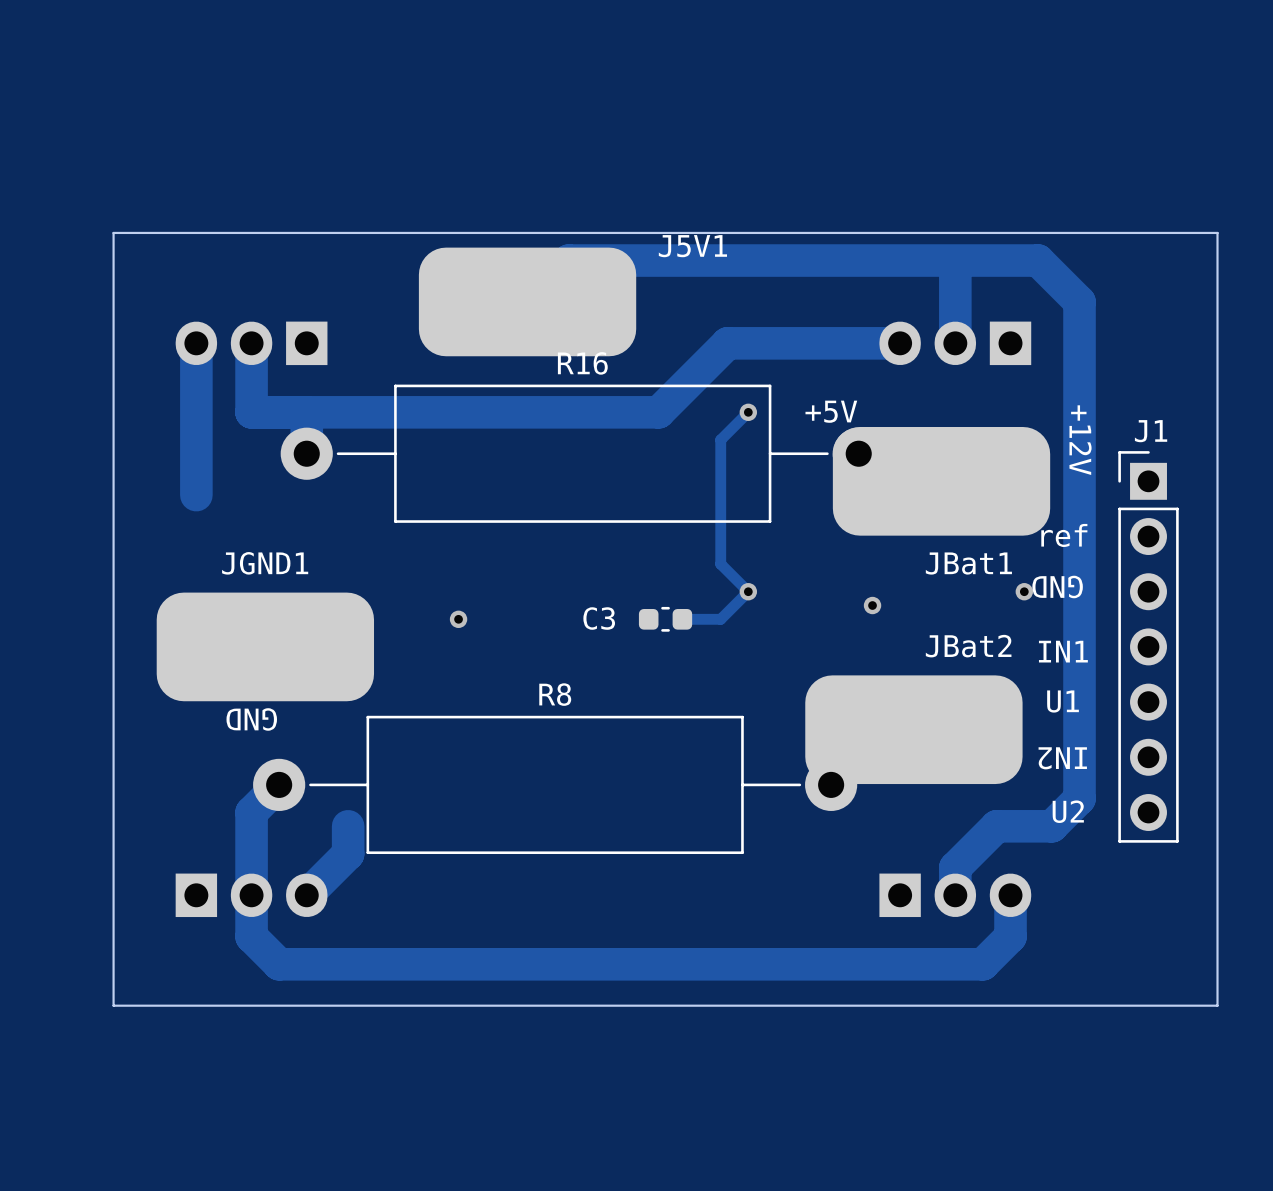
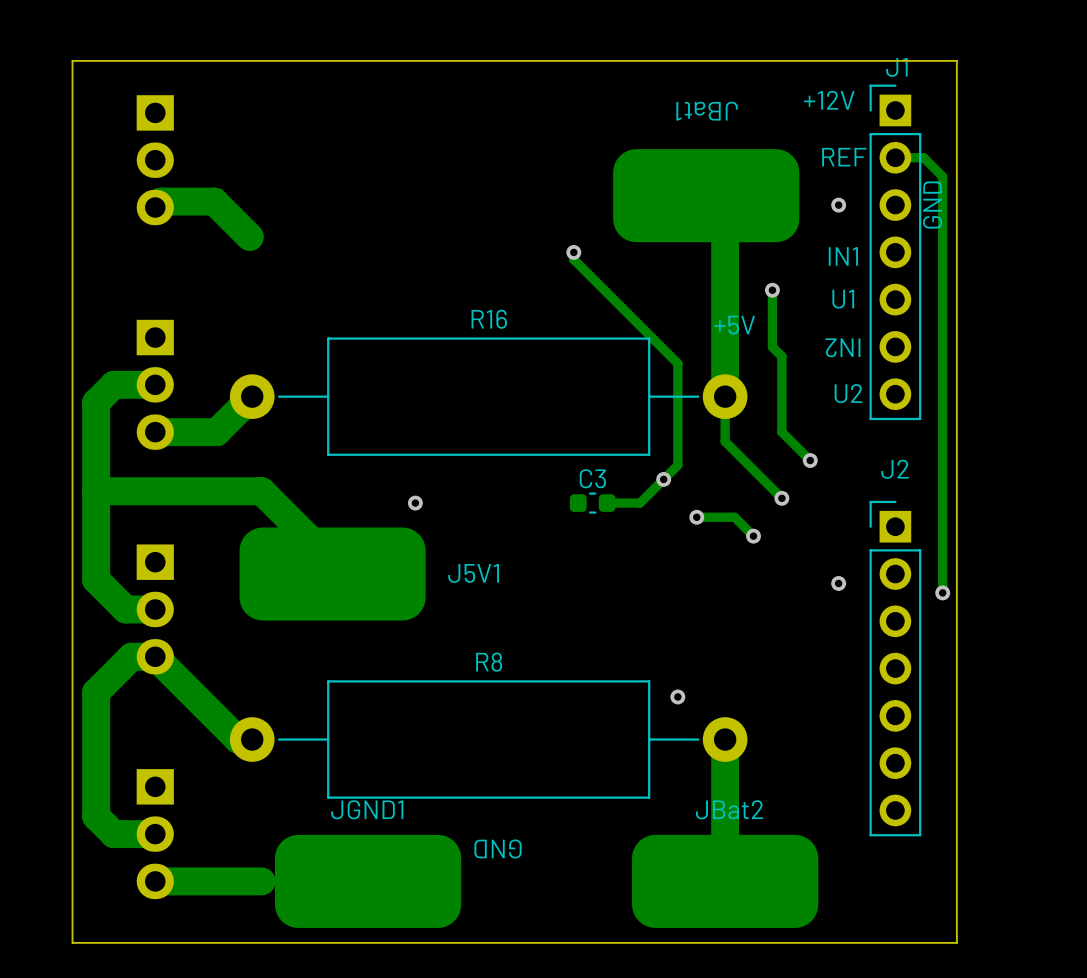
text: none -> REF (844, 157)
track: none -> (895, 157) (923, 157) (942, 176) (942, 592)
part: none -> (155, 160)
board edge: (1217, 232) (113, 232) (113, 1005) (1217, 1005) (1217, 232) -> (956, 60) (956, 942) (72, 942) (72, 60) (956, 60)
J5V1 name position: J5V1 (692, 246) -> J5V1 (473, 573)
track: none -> (706, 195) (725, 214) (725, 441) (781, 498)
via: none -> (838, 205)
track: none -> (155, 207) (161, 201) (214, 201) (249, 237)
track: (955, 274) (955, 343) -> none
track: (527, 301) (568, 260) (1038, 260) (1079, 301) (1079, 798) (1051, 826) (996, 826) (955, 867) (955, 895) -> none
J5V1 position: (527, 301) -> (332, 574)
via: none -> (573, 252)
track: (196, 343) (196, 495) -> none
part: (251, 343) -> none
track: (900, 343) (727, 343) (658, 412) (251, 412) (251, 343) -> none
part: (955, 343) -> none
track: none -> (772, 290) (772, 347) (781, 356) (781, 432) (810, 460)
via: none -> (772, 290)
track: (748, 412) (720, 439) (720, 564) (748, 591) -> (573, 252) (573, 259) (677, 363) (677, 465) (663, 479)
via: (748, 412) -> none
text rotation: 0° (1080, 440) -> 90° counterclockwise (829, 100)
text position: +12V (1080, 440) -> +12V (829, 100)
R16 position: (582, 453) -> (488, 396)
track: none -> (155, 384) (113, 384) (96, 402) (96, 579) (125, 609) (155, 609)
part: none -> (155, 384)
JBat1 position: (941, 481) -> (706, 195)
track: none -> (252, 396) (216, 432) (155, 432)
text: ref (1064, 535) -> none
JBat1 name rotation: 0° (968, 563) -> 180° (707, 111)
JBat1 name position: JBat1 (968, 563) -> JBat1 (707, 111)
via: none -> (810, 460)
text rotation: 0° (1057, 586) -> 90° clockwise (932, 205)
text position: GND (1057, 586) -> GND (932, 205)
via: (1024, 591) -> none
track: none -> (96, 491) (261, 491) (332, 562) (332, 574)
via position: (872, 605) -> (781, 498)
C3 name position: C3 (599, 618) -> C3 (592, 478)
track: none -> (696, 517) (734, 517) (753, 536)
via: none -> (696, 517)
JGND1 position: (265, 646) -> (368, 881)
JBat2 name position: JBat2 (968, 646) -> JBat2 (729, 809)
J1 position: (1148, 646) -> (895, 252)
text position: IN1 (1063, 651) -> IN1 (843, 256)
via: none -> (753, 536)
text position: U1 (1063, 701) -> U1 (843, 299)
via: none -> (838, 583)
text: GND (251, 719) -> none
via: none -> (942, 592)
JBat2 position: (913, 729) -> (725, 881)
part: none -> (155, 609)
text position: IN2 (1062, 758) -> IN2 (842, 347)
track: (279, 784) (251, 812) (251, 936) (279, 964) (982, 964) (1010, 936) (1010, 895) -> none
R8 position: (555, 784) -> (488, 739)
text position: U2 (1068, 811) -> U2 (848, 393)
J2: none -> (895, 668)
track: (348, 826) (348, 853) (306, 895) -> none
via: none -> (677, 696)
part: (251, 895) -> none
track: none -> (252, 739) (238, 739) (155, 656) (131, 656) (96, 692) (96, 816) (113, 834) (155, 834)
track: none -> (725, 739) (725, 881)
part: (955, 895) -> none
part: none -> (155, 834)
text: none -> GND (498, 848)
track: none -> (261, 881) (155, 881)

